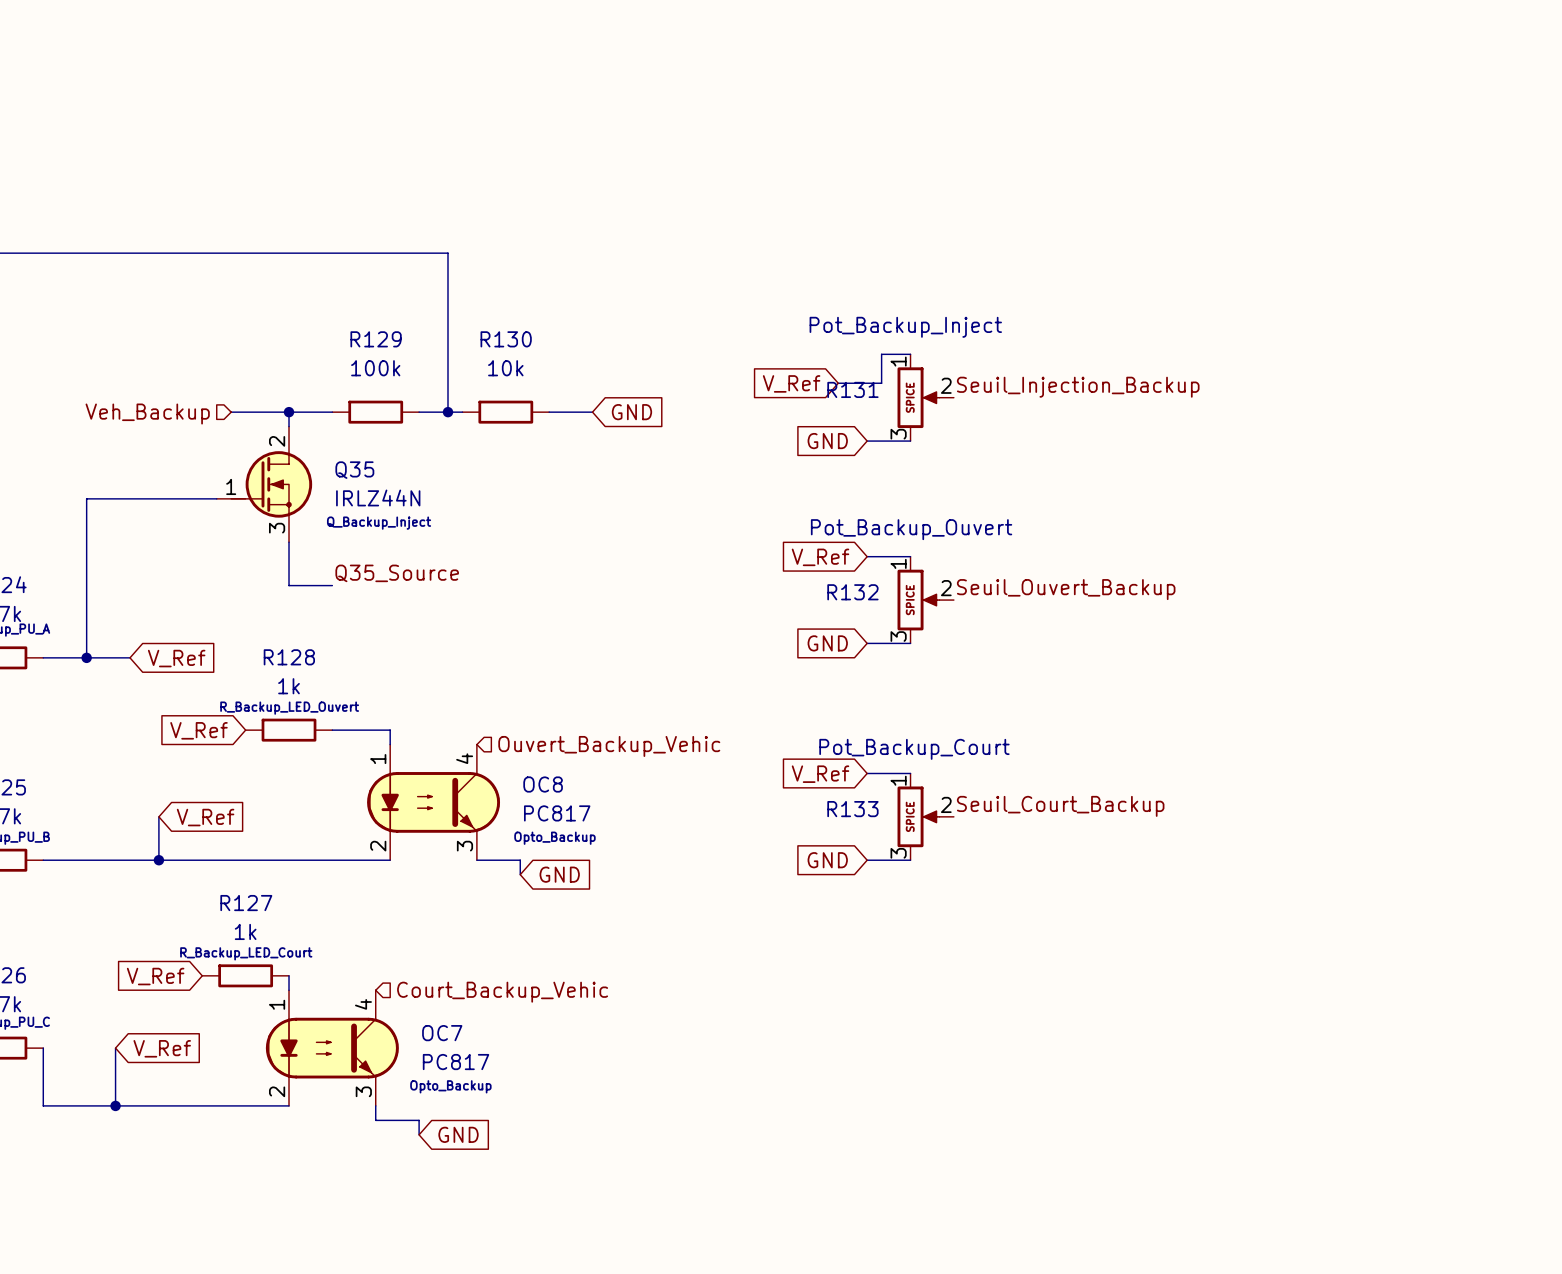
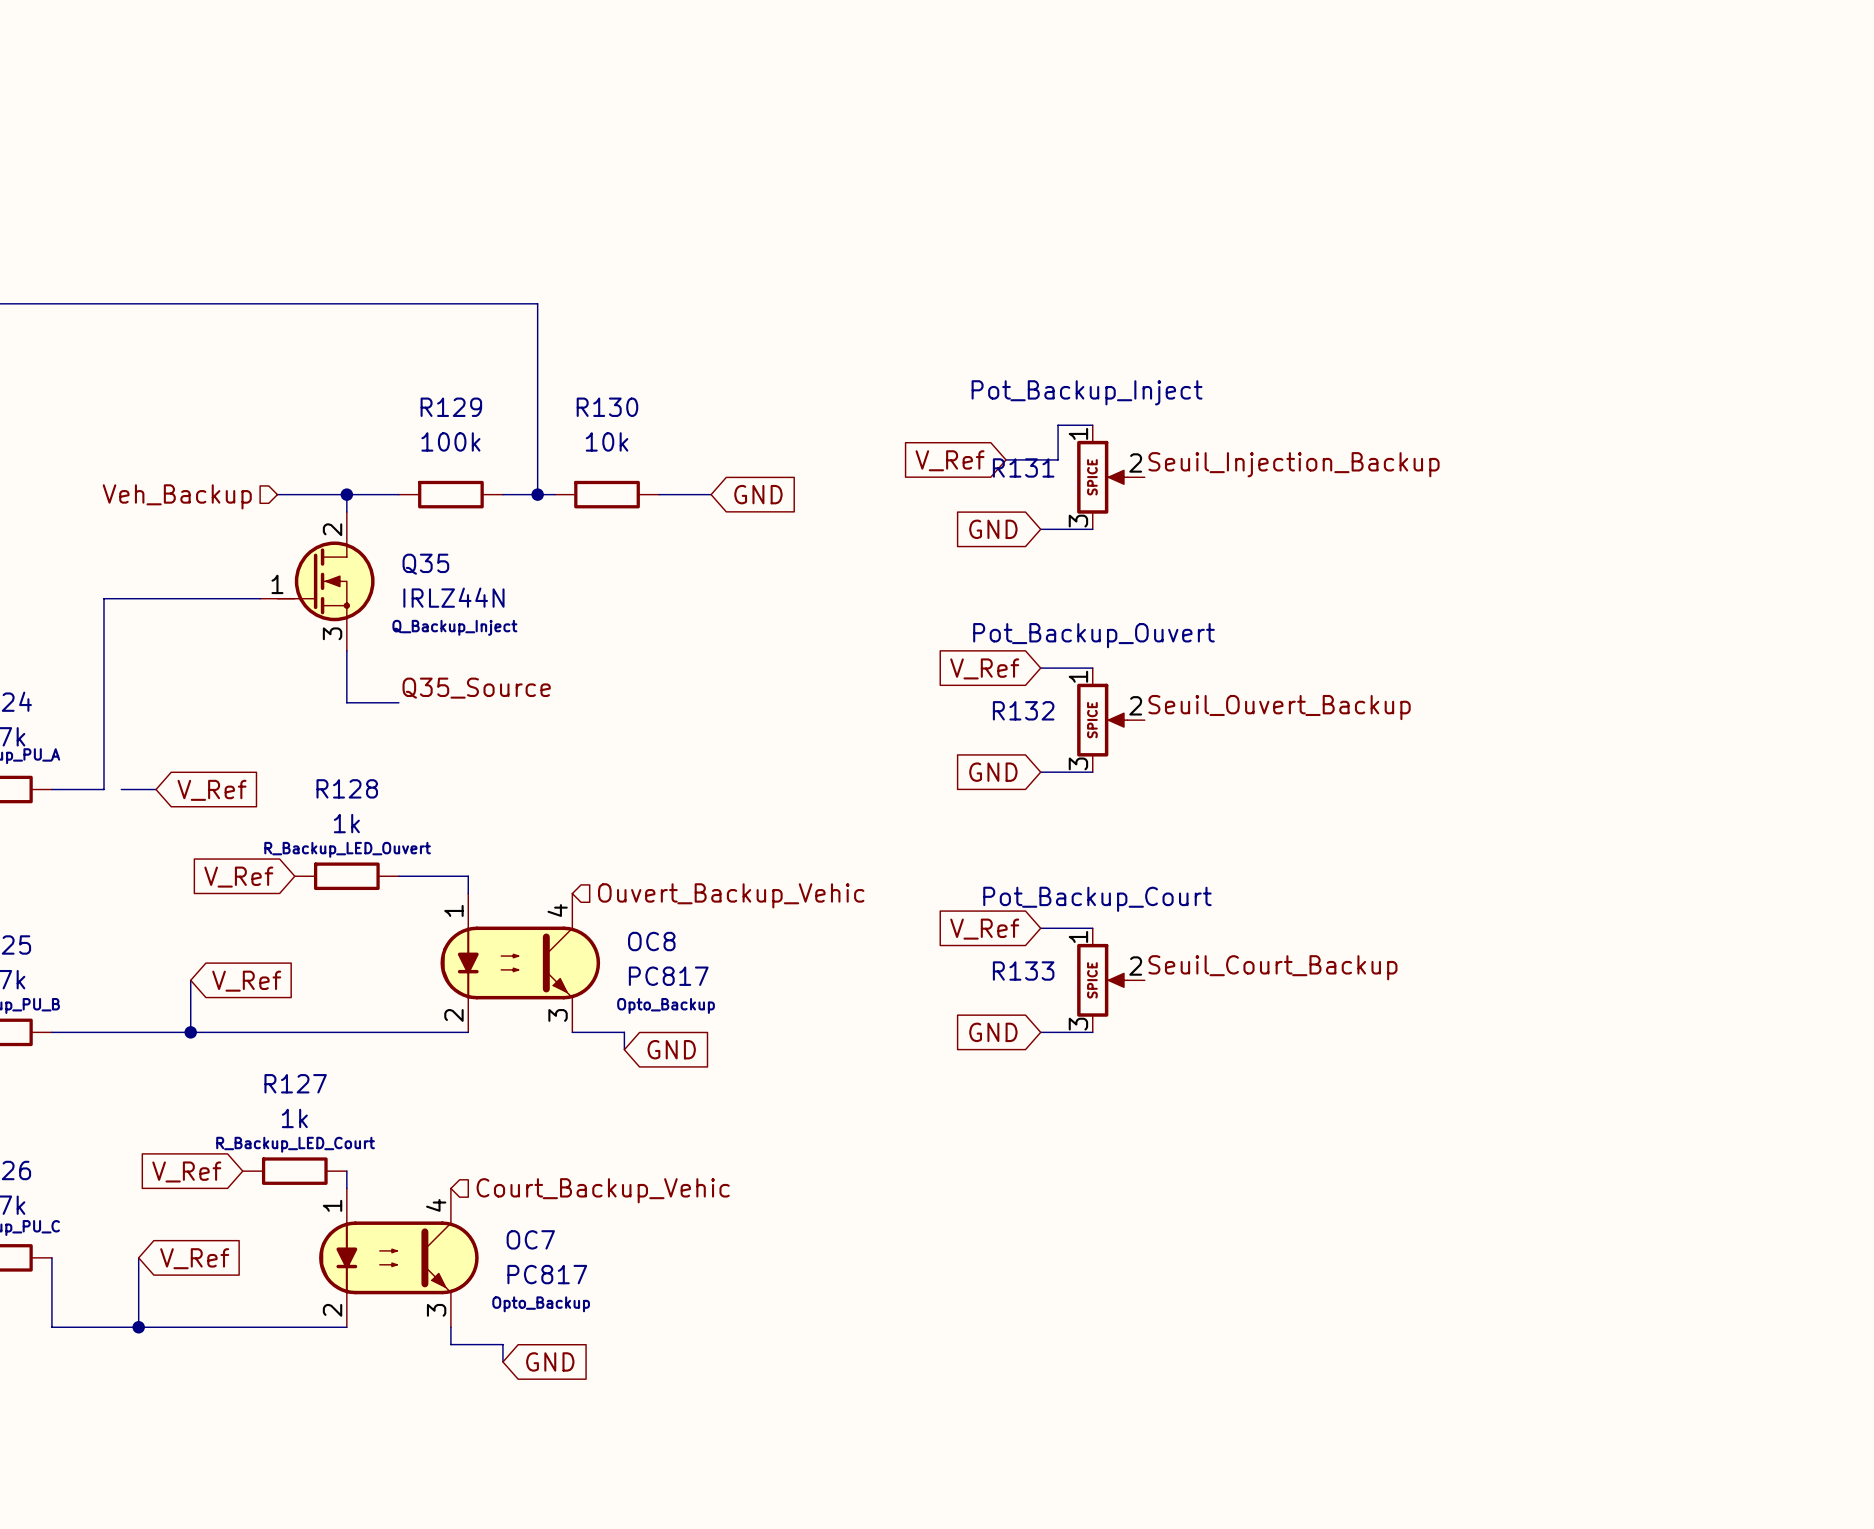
wire: (86, 657) (101, 657) -> none
junction: (86, 657) -> none

